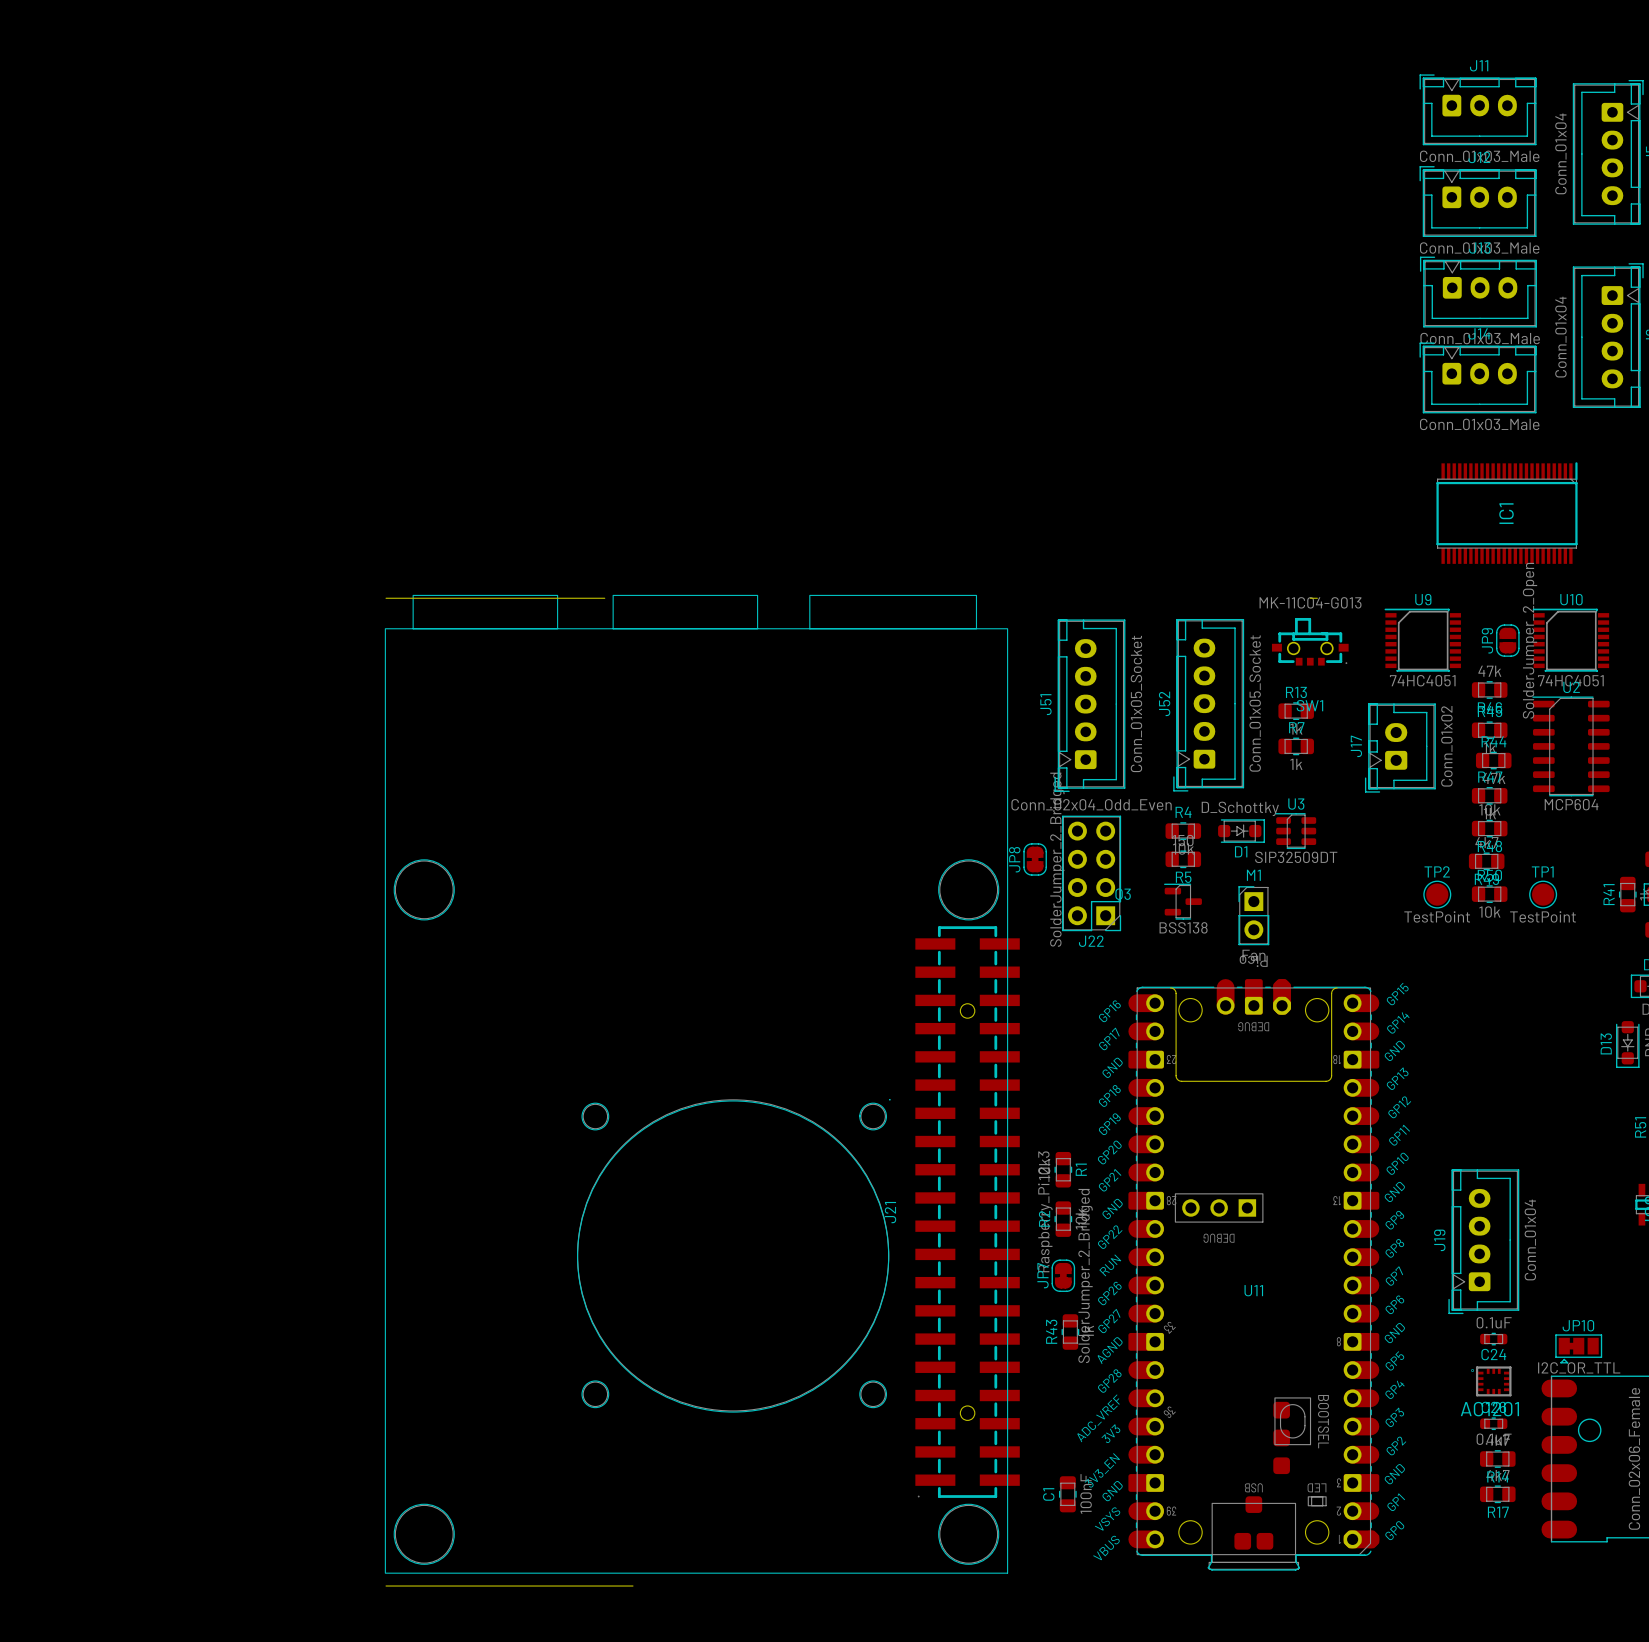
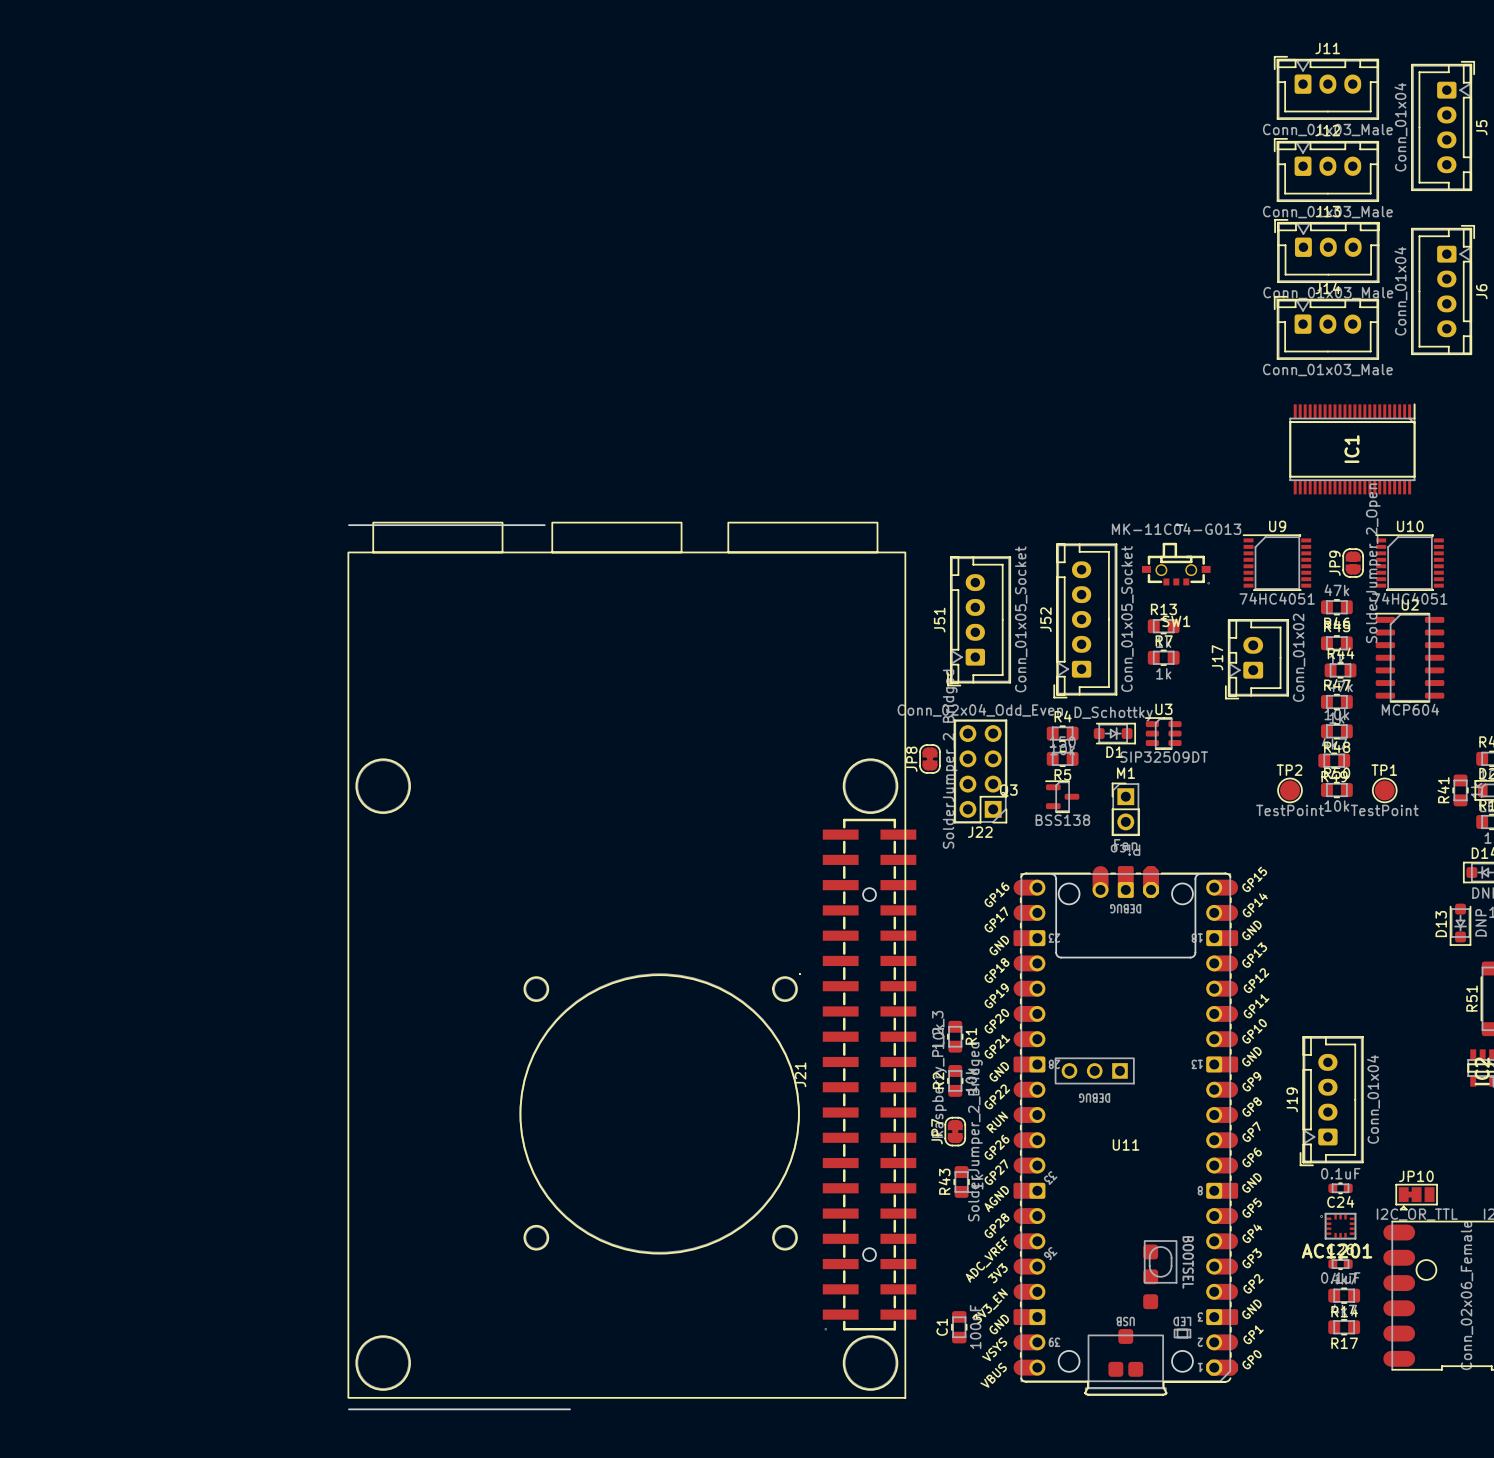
J51 footprint: [1054, 619, 1126, 792] -> [947, 556, 1011, 687]

